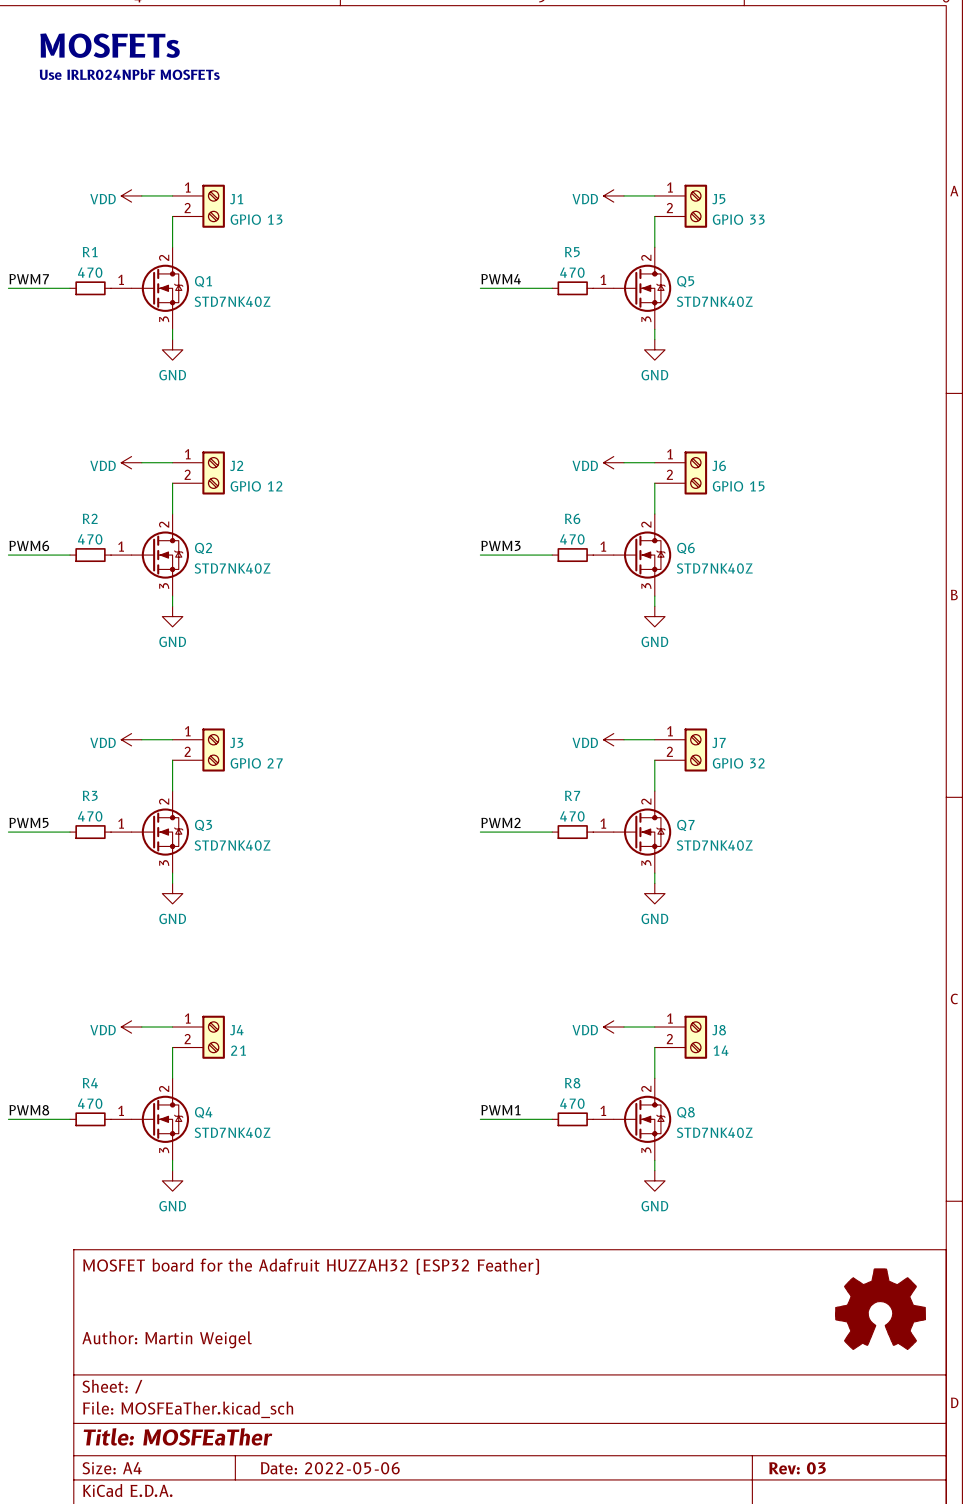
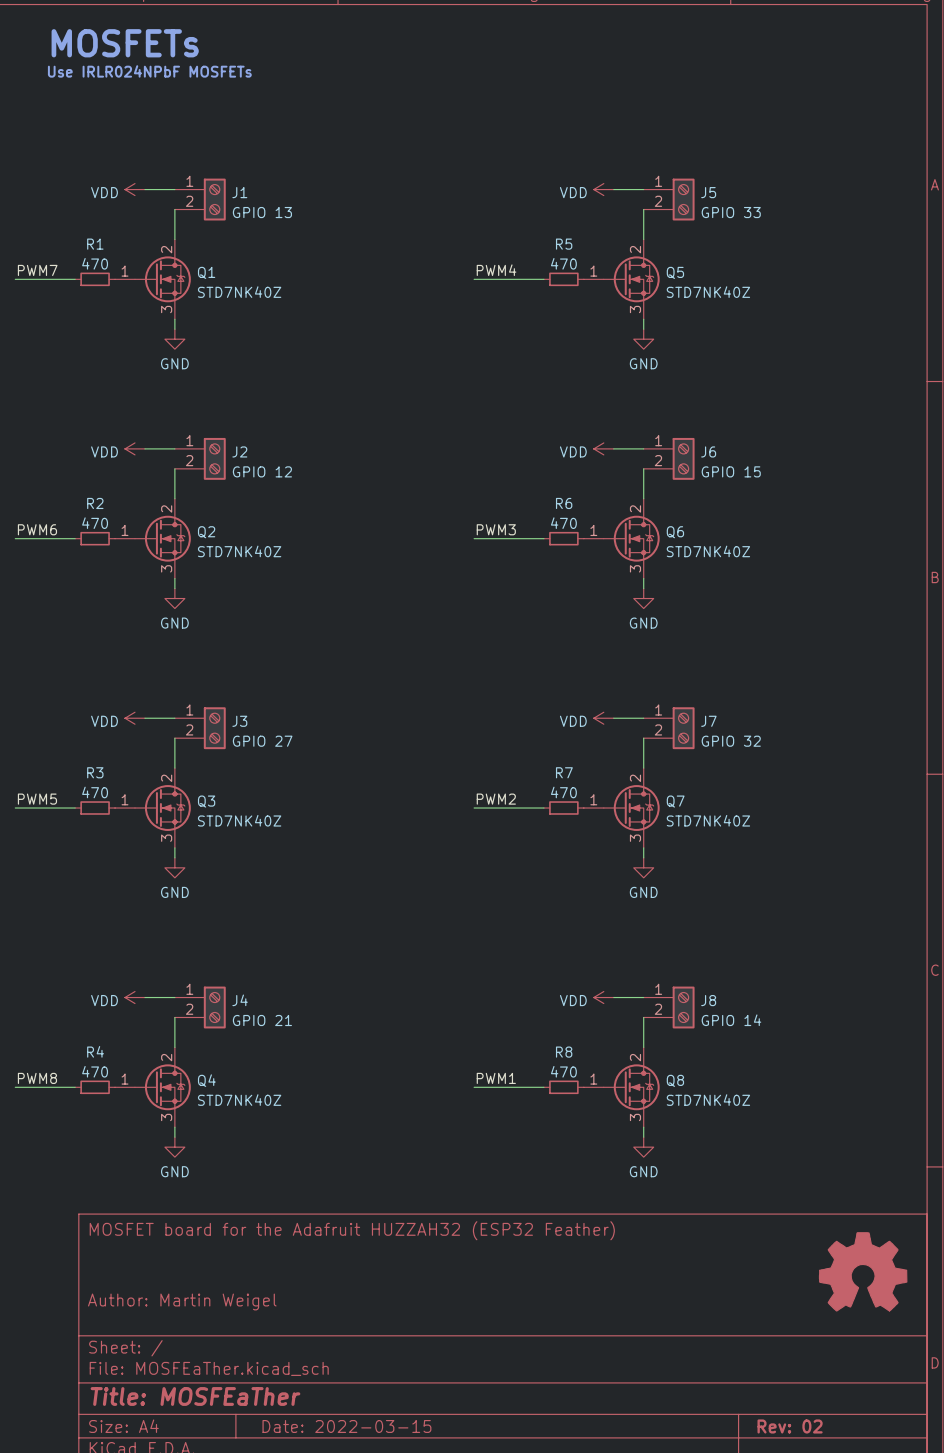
J4 value: 21 (238, 1050) -> GPIO 21 (262, 1020)
J8 value: 14 (721, 1050) -> GPIO 14 (731, 1020)
title block: Date: 2022-05-06 (330, 1468) -> Date: 2022-03-15 (346, 1426)
title block: Rev: 03 (797, 1468) -> Rev: 02 (790, 1426)

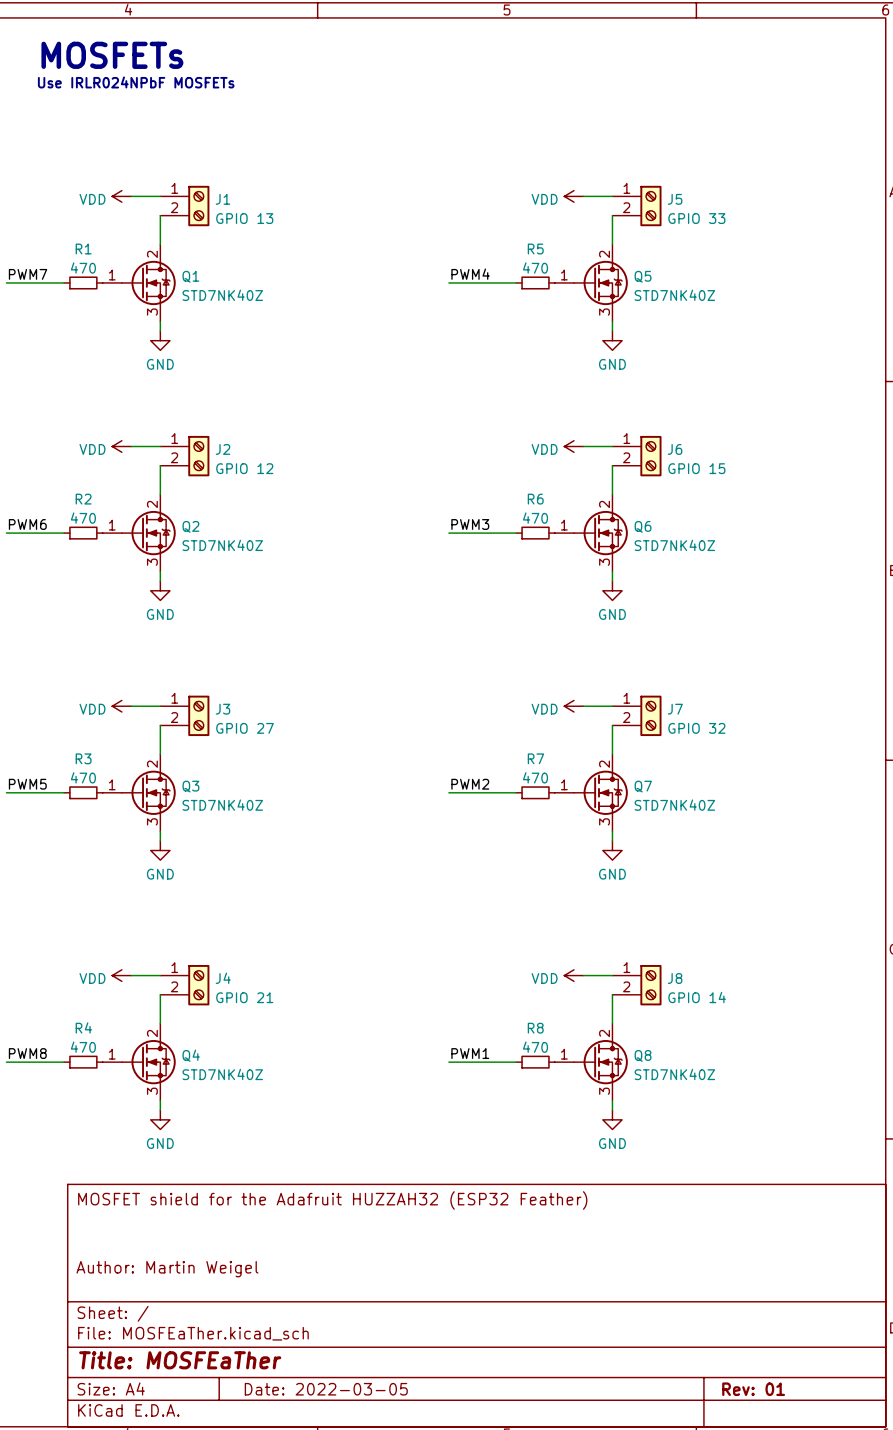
title block: MOSFET board for the Adafruit HUZZAH32 (ESP32 Feather) (352, 1230) -> MOSFET shield for the Adafruit HUZZAH32 (ESP32 Feather) (332, 1200)
power symbol: (863, 1271) -> none
title block: Date: 2022-03-15 (346, 1426) -> Date: 2022-03-05 (326, 1389)
title block: Rev: 02 (790, 1426) -> Rev: 01 (753, 1389)

